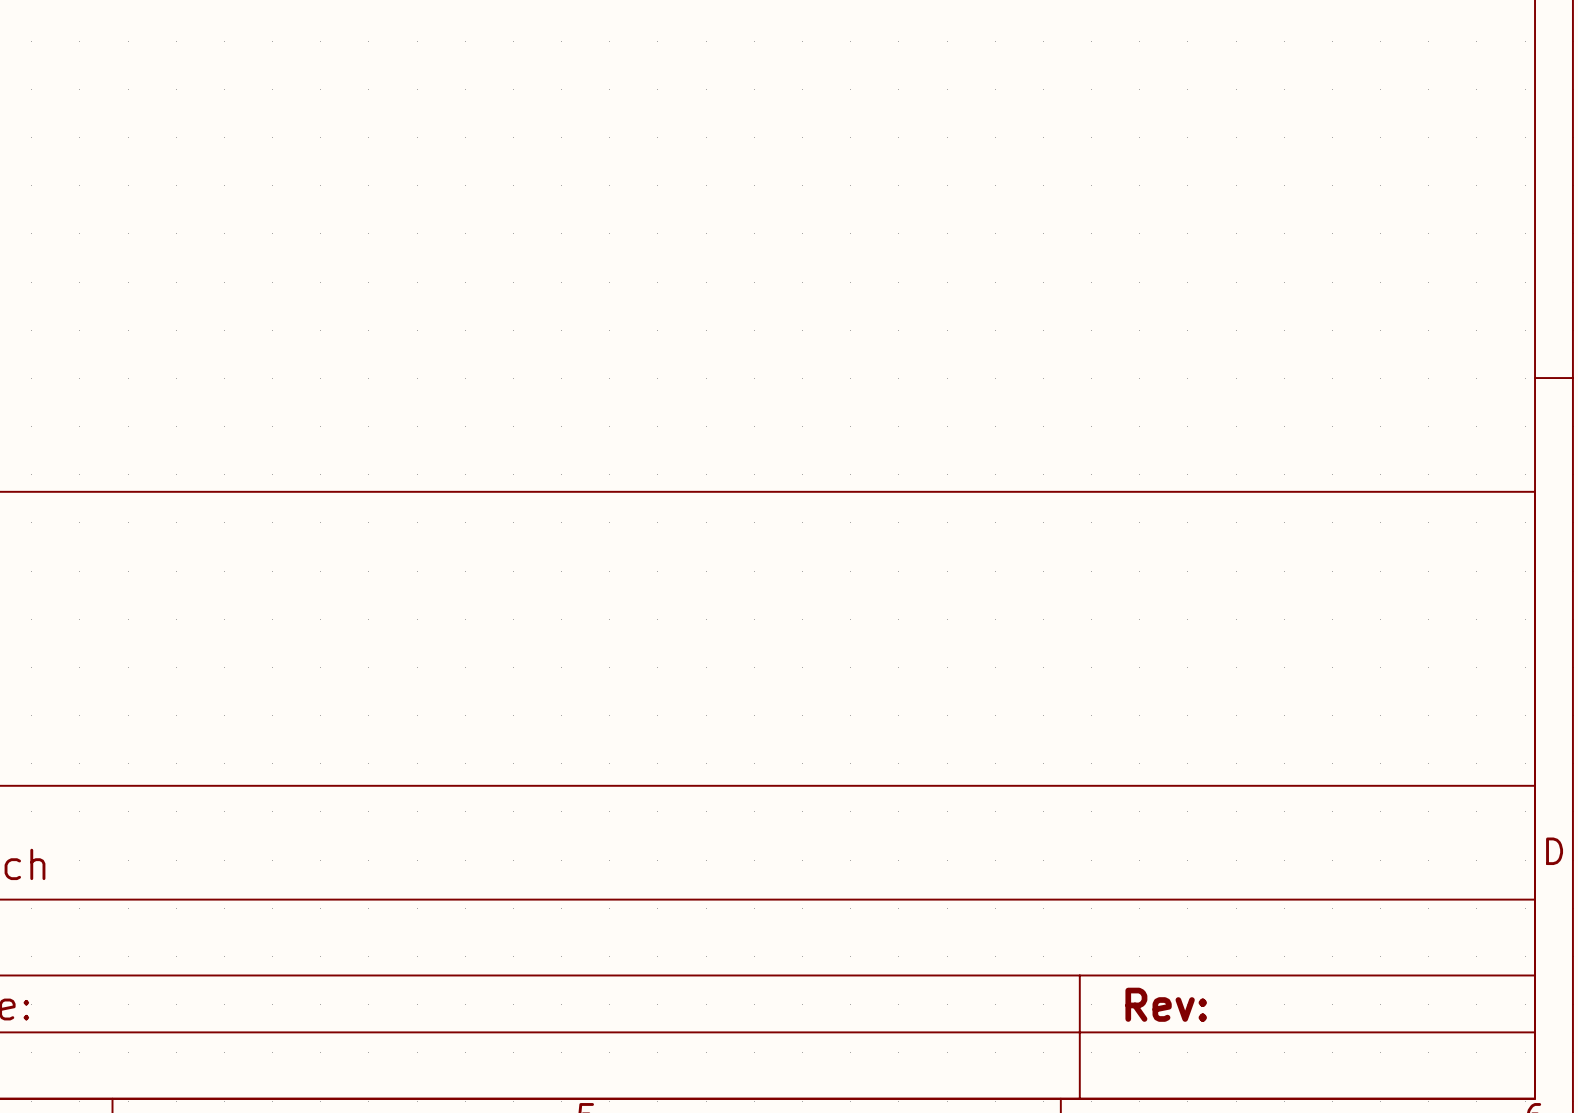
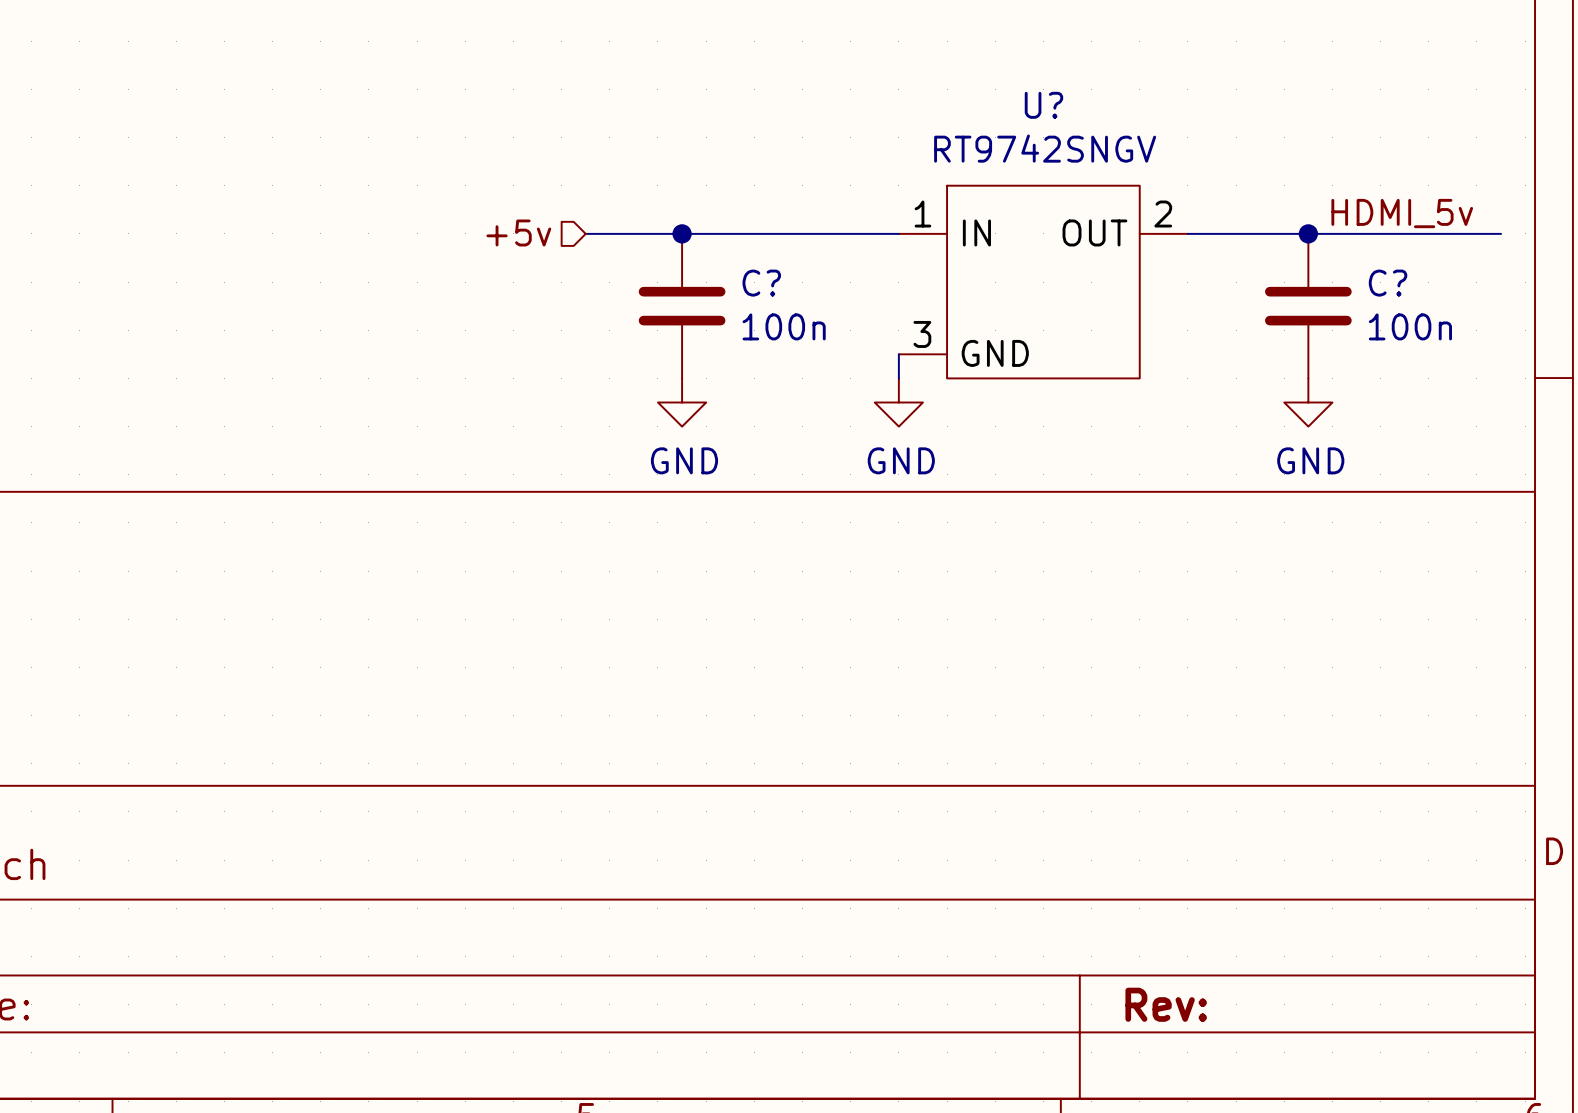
label: none -> HDMI_5v (1402, 213)
hierarchical label: none -> +5v (518, 232)
wire: none -> (585, 233) (898, 233)
junction: none -> (682, 233)
wire: none -> (1187, 233) (1501, 233)
junction: none -> (1308, 233)
U?: none -> RT9742SNGV (1043, 282)
C?: none -> 100n (682, 306)
C?: none -> 100n (1308, 306)
wire: none -> (898, 354) (898, 378)
power symbol: none -> GND (682, 402)
power symbol: none -> GND (898, 402)
power symbol: none -> GND (1308, 402)

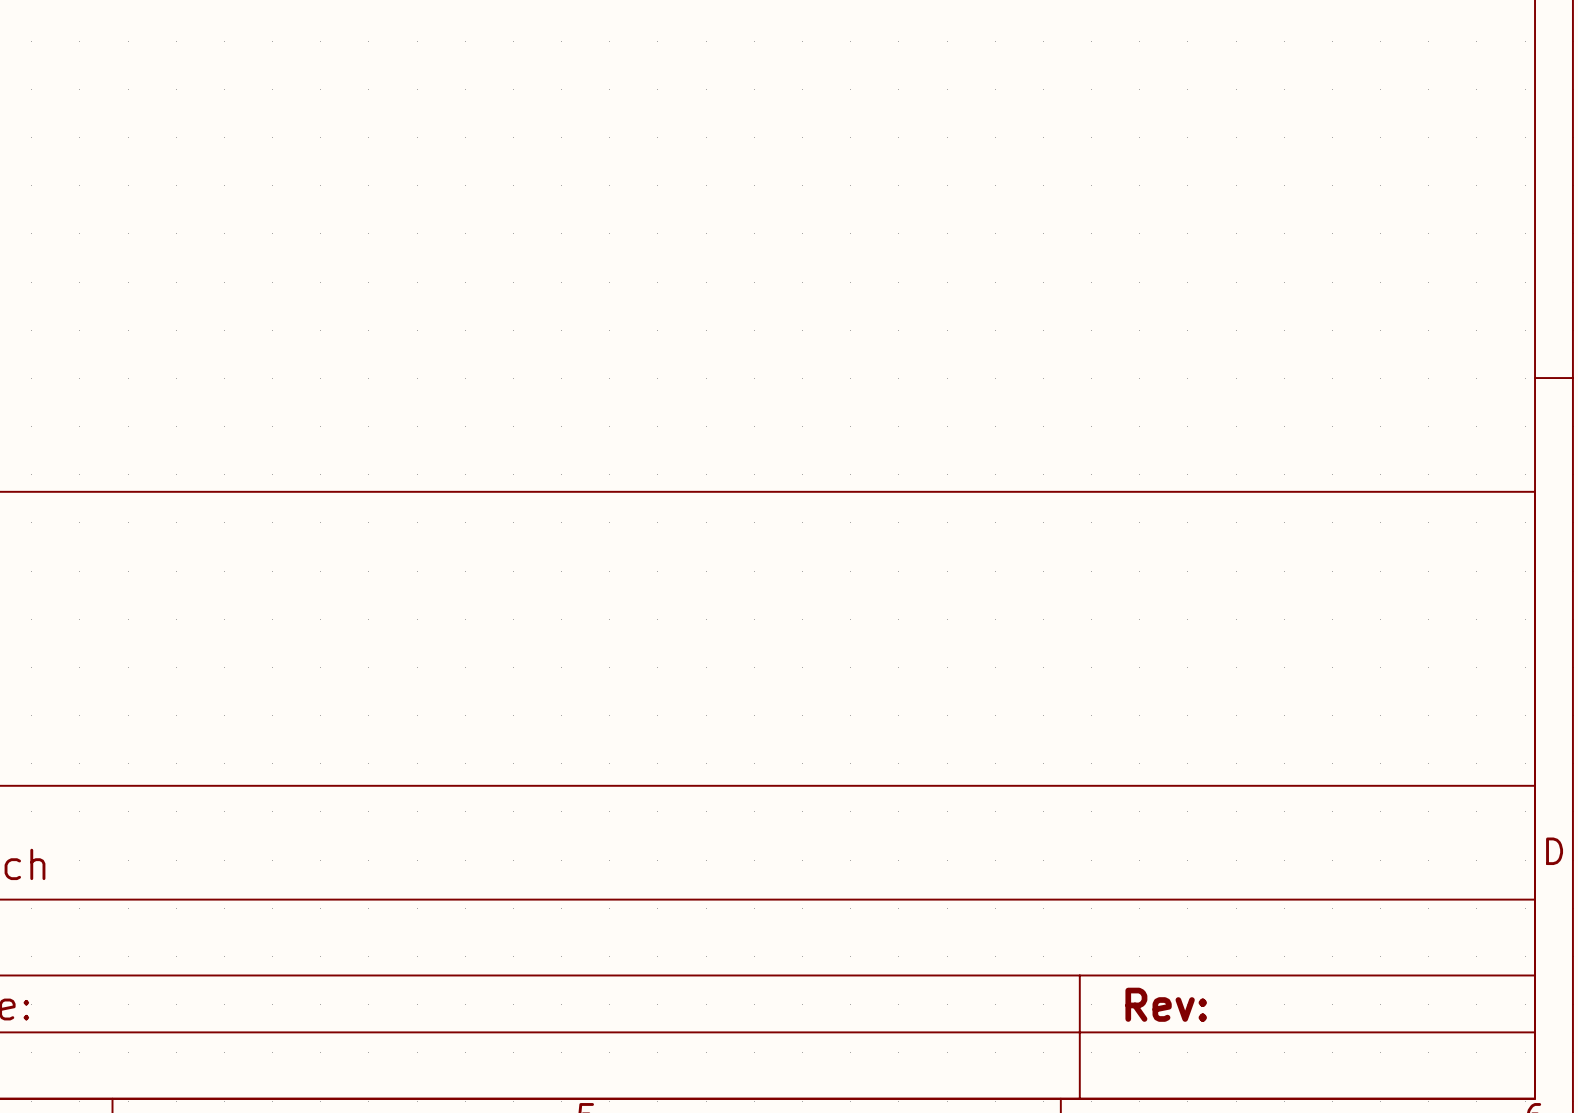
label: HDMI_5v (1402, 213) -> none
hierarchical label: +5v (518, 232) -> none
wire: (585, 233) (898, 233) -> none
junction: (682, 233) -> none
wire: (1187, 233) (1501, 233) -> none
junction: (1308, 233) -> none
U?: RT9742SNGV (1043, 282) -> none
C?: 100n (682, 306) -> none
C?: 100n (1308, 306) -> none
wire: (898, 354) (898, 378) -> none
power symbol: GND (682, 402) -> none
power symbol: GND (898, 402) -> none
power symbol: GND (1308, 402) -> none

